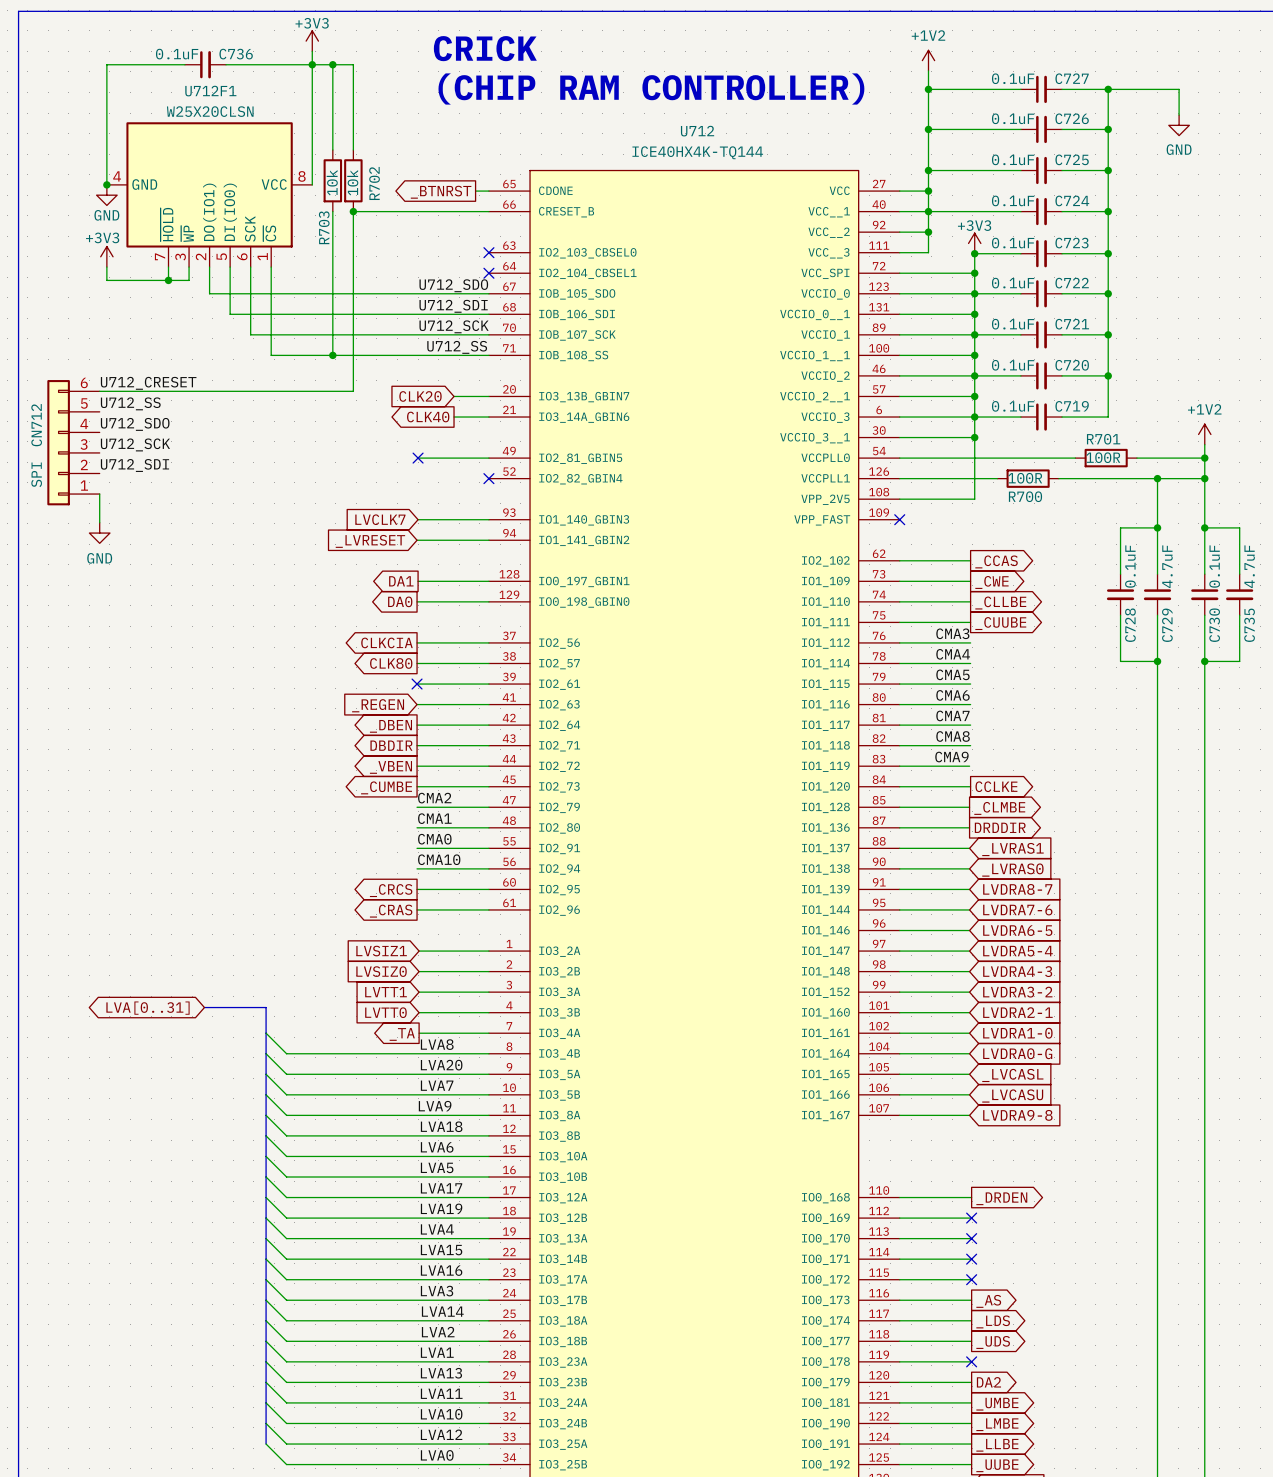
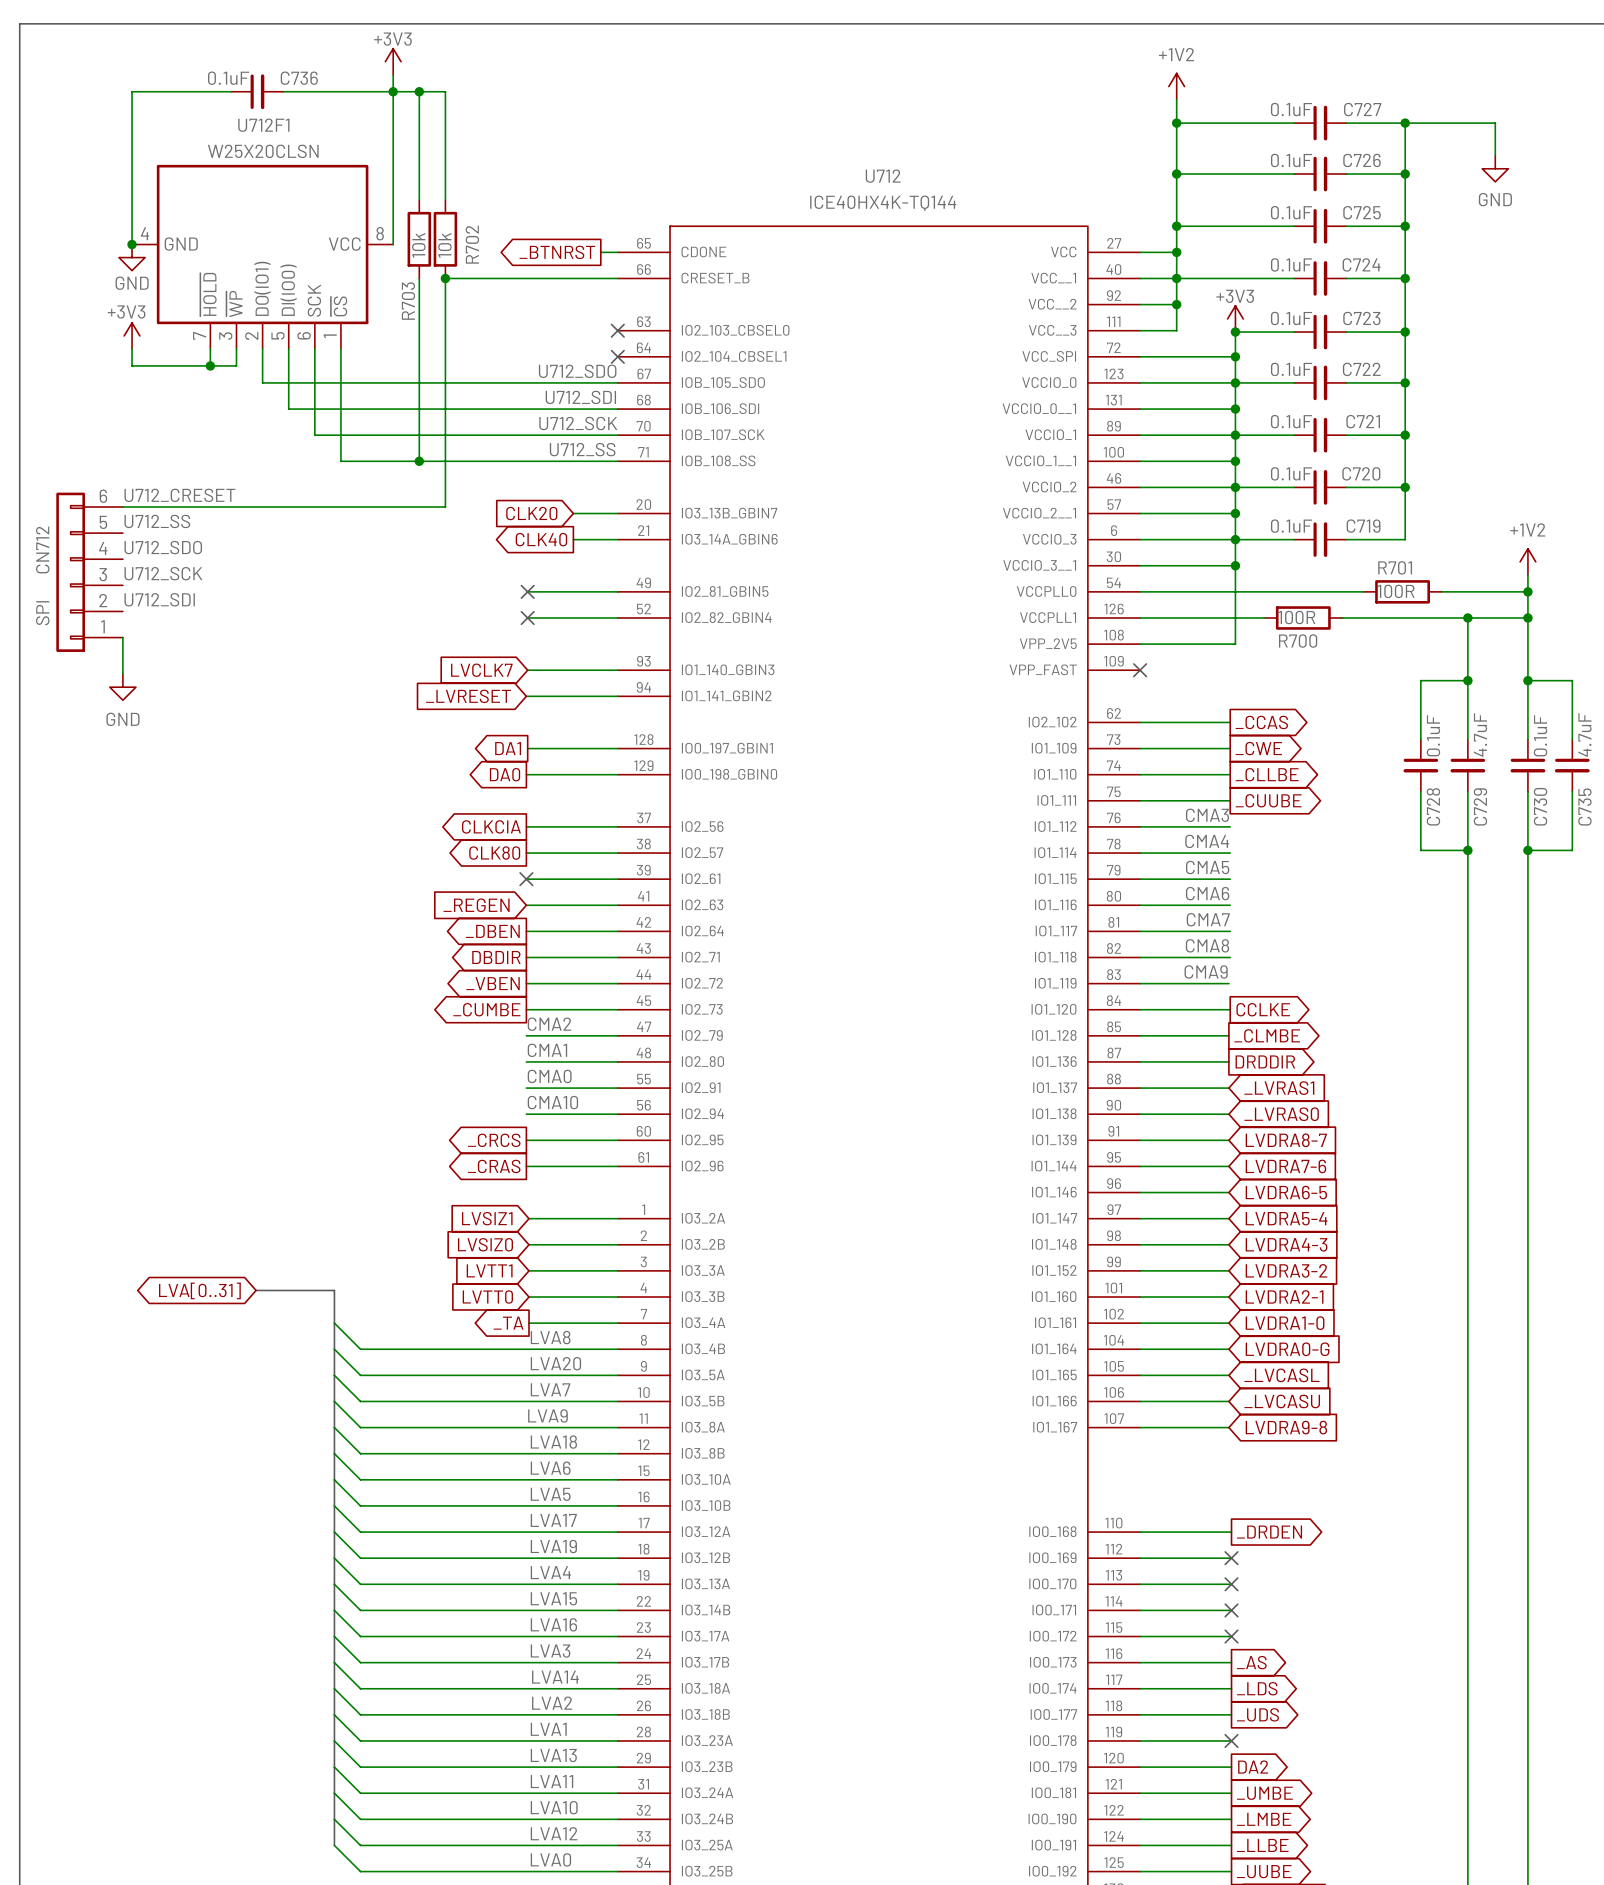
text: CRICK (485, 48) -> none
text: (CHIP RAM CONTROLLER) (651, 88) -> none
wire: none -> (527, 617) (617, 617)
no-connect mark: none -> (527, 617)
no-connect mark: (488, 478) -> none

